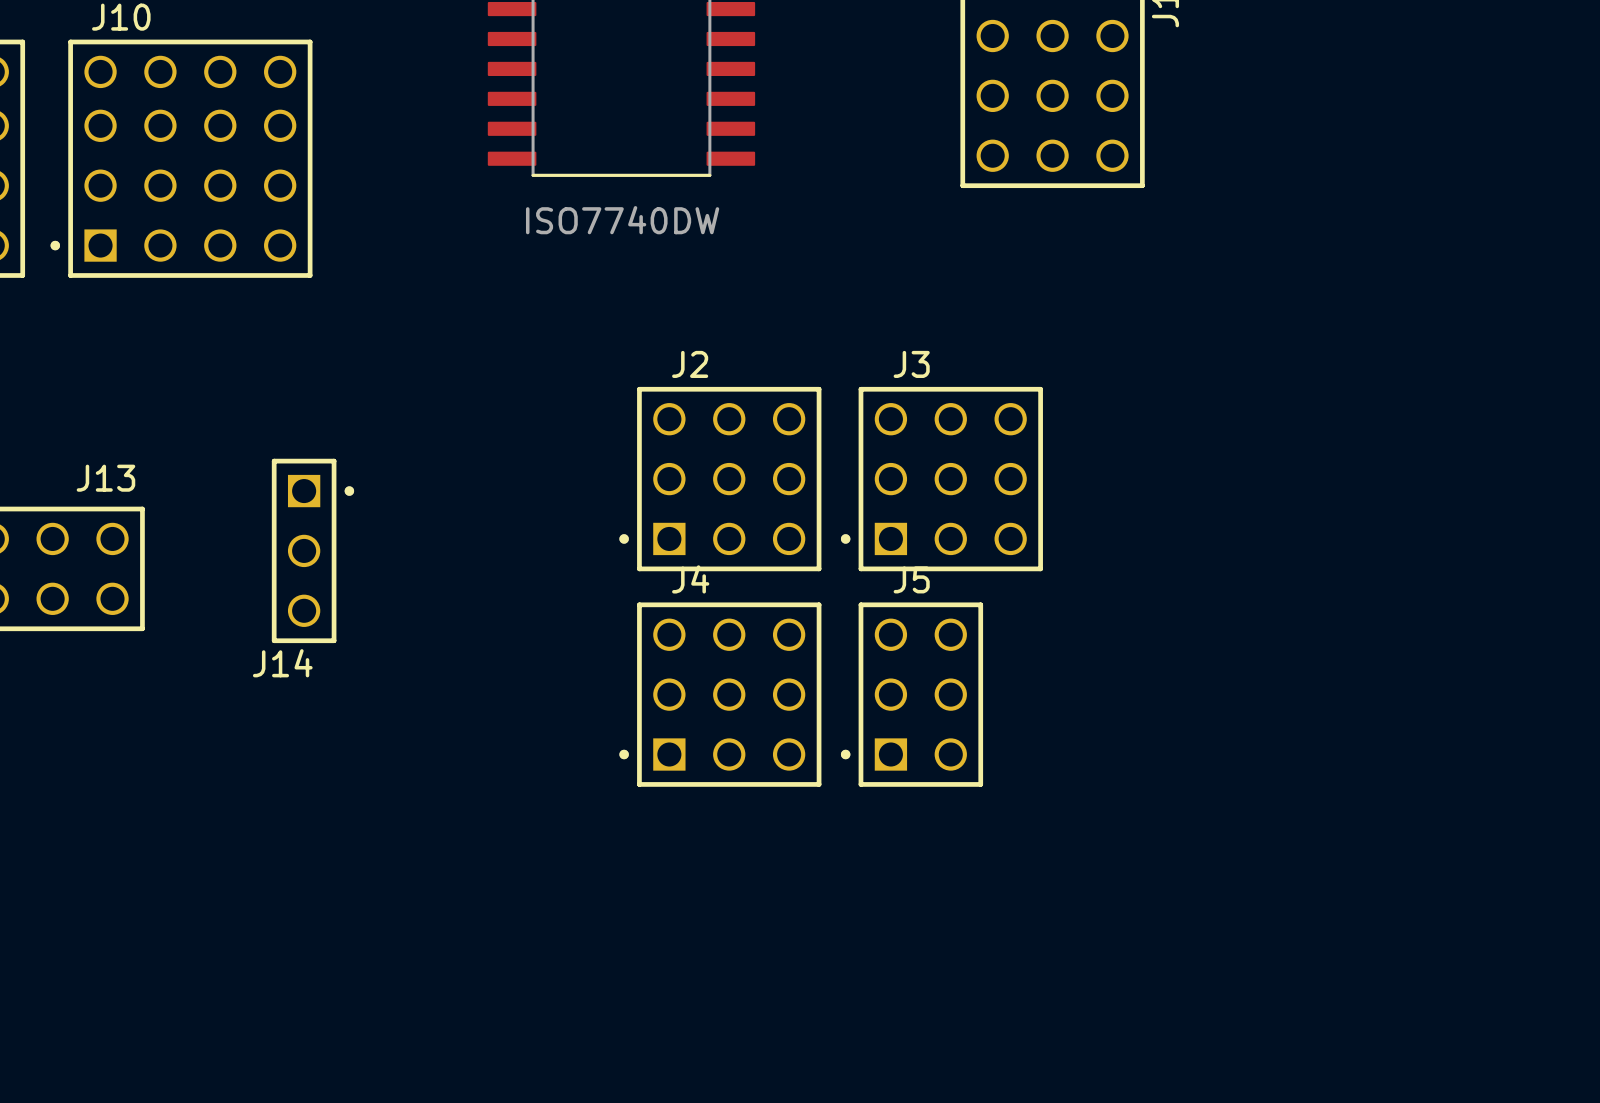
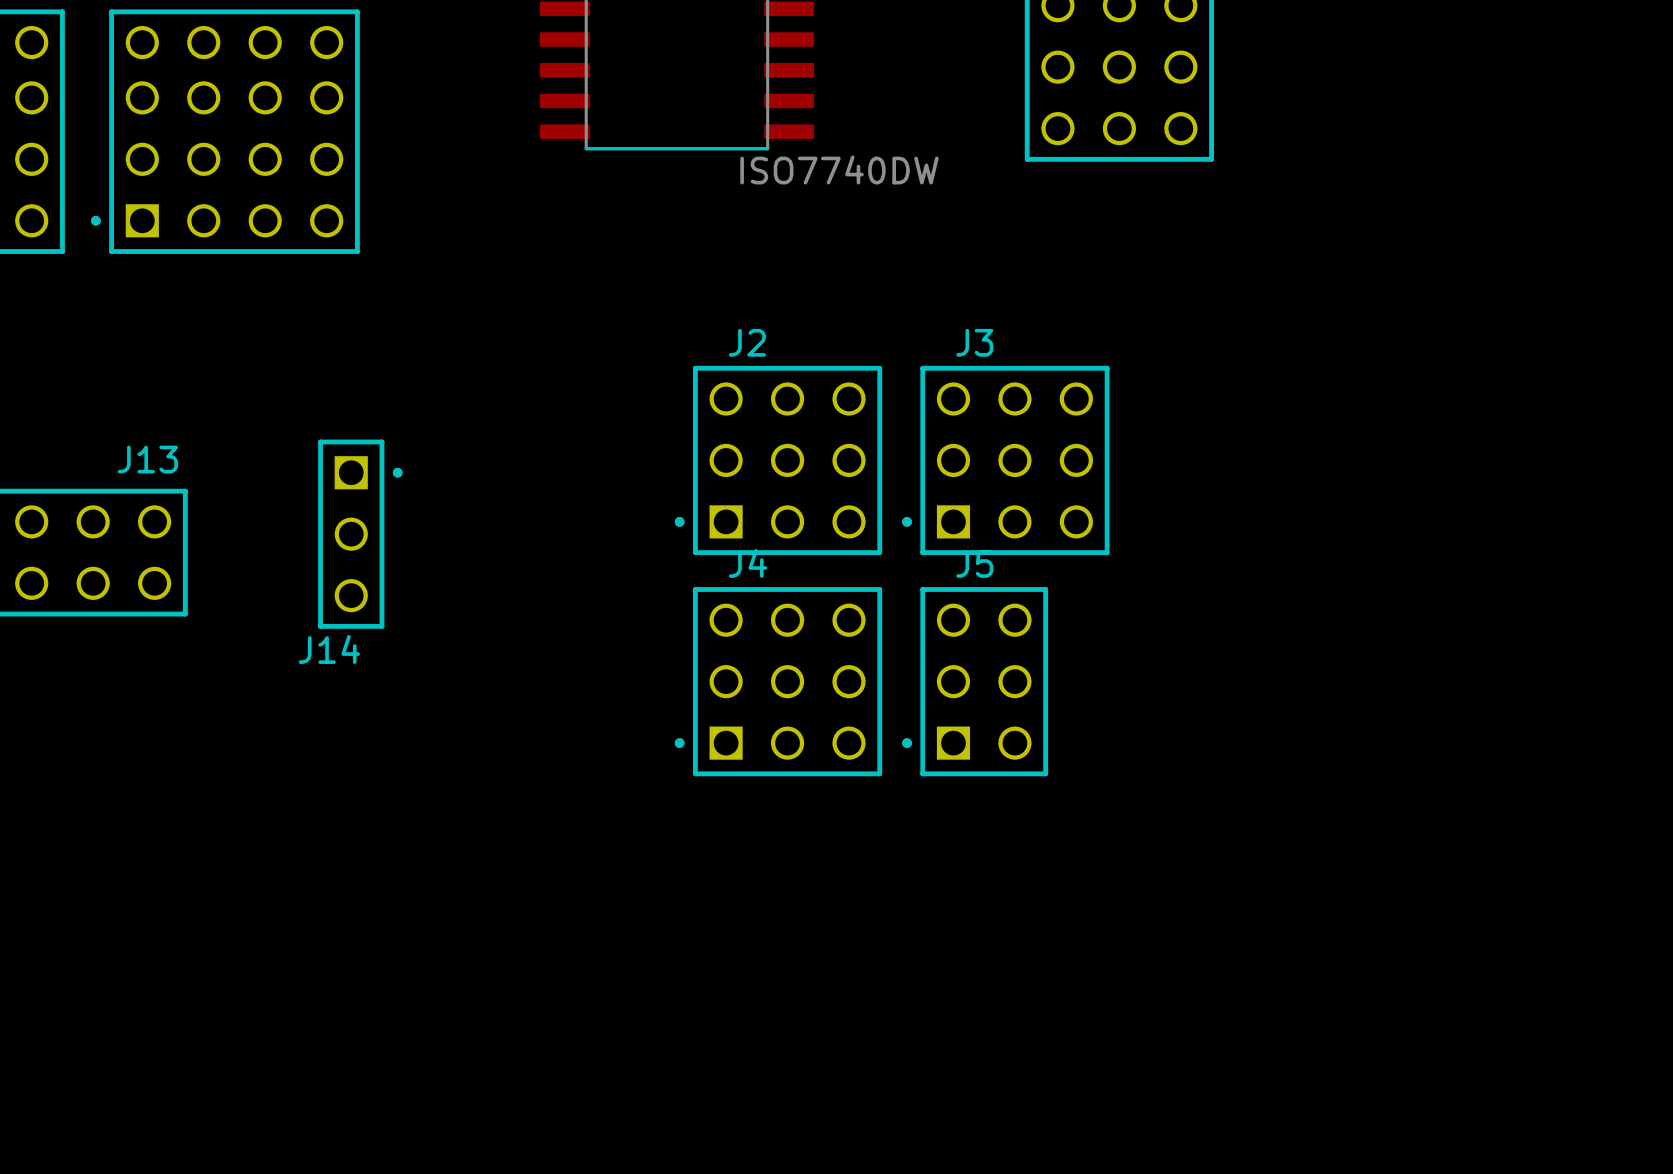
part value position: ISO7740DW (622, 220) -> ISO7740DW (839, 169)

